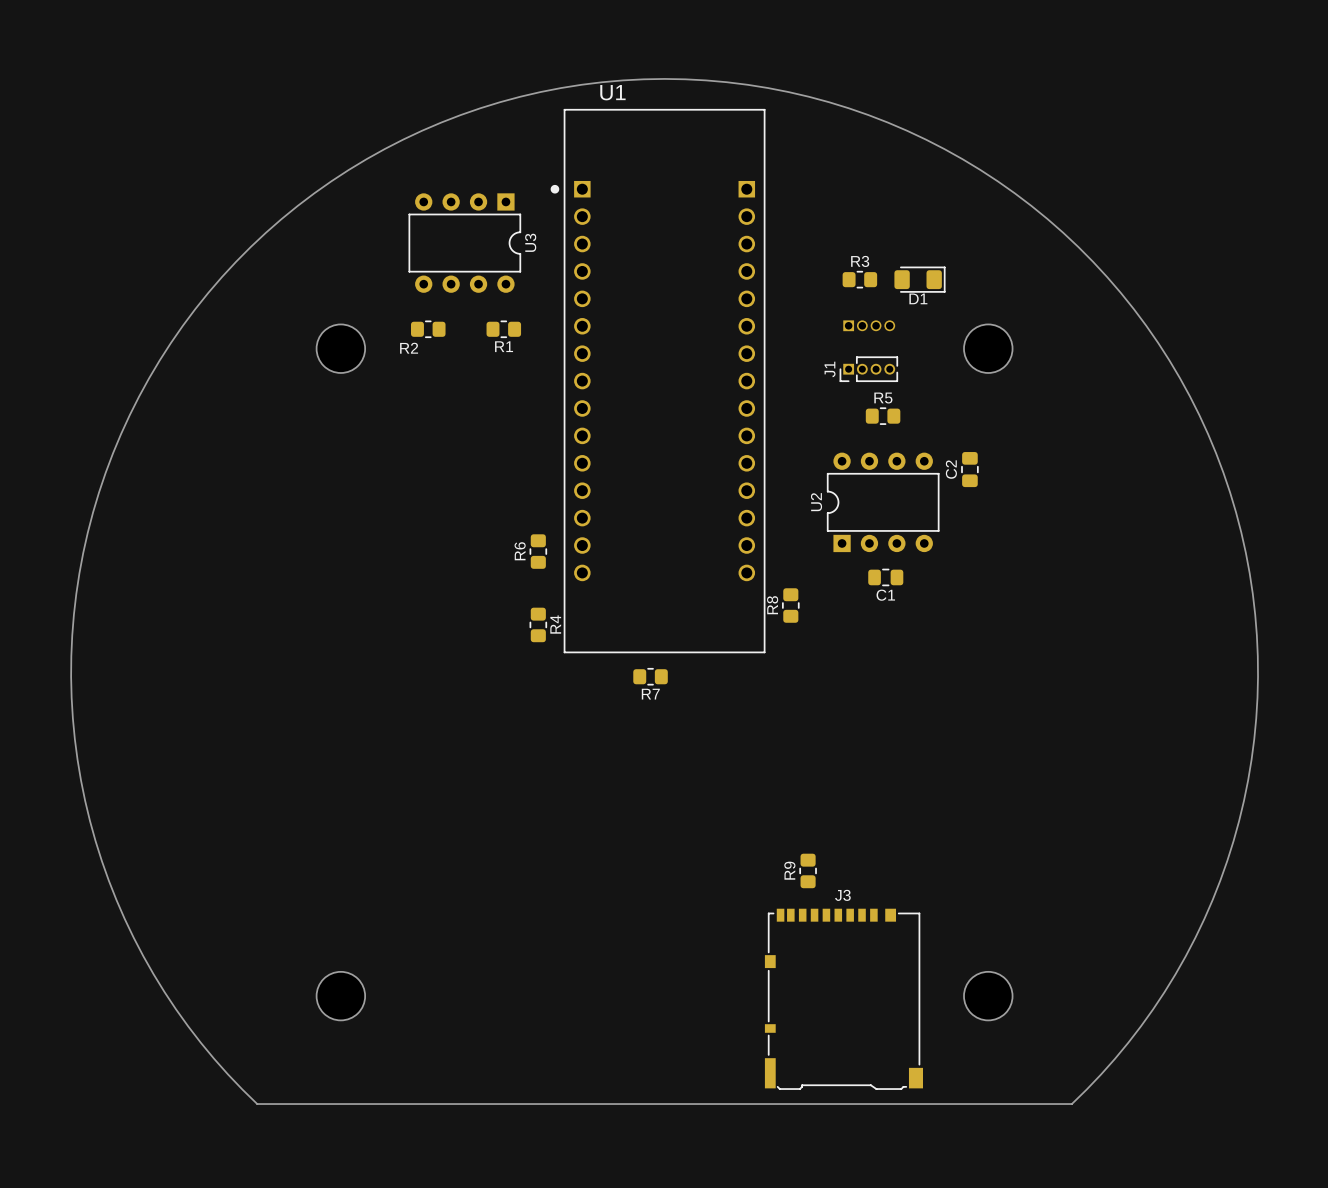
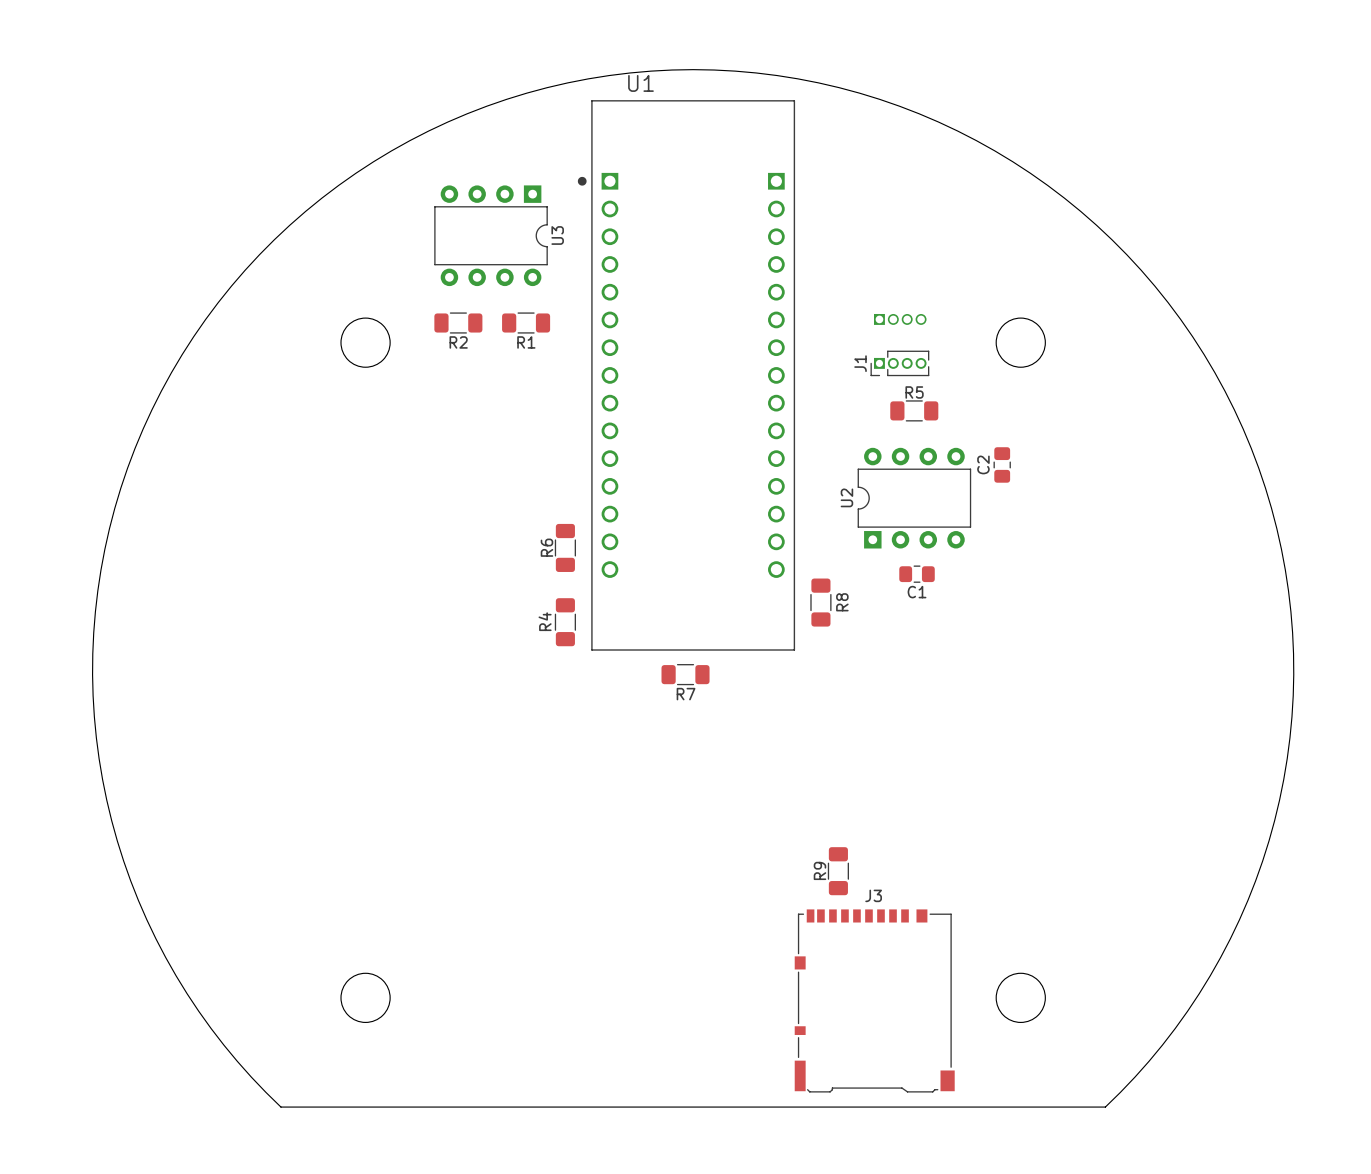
R3: (859, 279) -> none
D1: (919, 279) -> none
R2 footprint: [411, 320, 446, 338] -> [434, 312, 483, 334]
R1 footprint: [486, 320, 522, 338] -> [502, 312, 551, 334]
R5 footprint: [865, 407, 901, 425] -> [890, 400, 939, 422]
R6 footprint: [529, 534, 547, 569] -> [554, 523, 576, 572]
R8 footprint: [782, 588, 800, 623] -> [810, 578, 832, 627]
R8 name position: R8 (772, 605) -> R8 (842, 602)
R4 footprint: [529, 607, 547, 643] -> [554, 598, 576, 647]
R4 name position: R4 (555, 624) -> R4 (545, 621)
R7 footprint: [633, 668, 668, 686] -> [661, 664, 710, 686]
R9 footprint: [799, 853, 817, 889] -> [827, 847, 849, 896]

